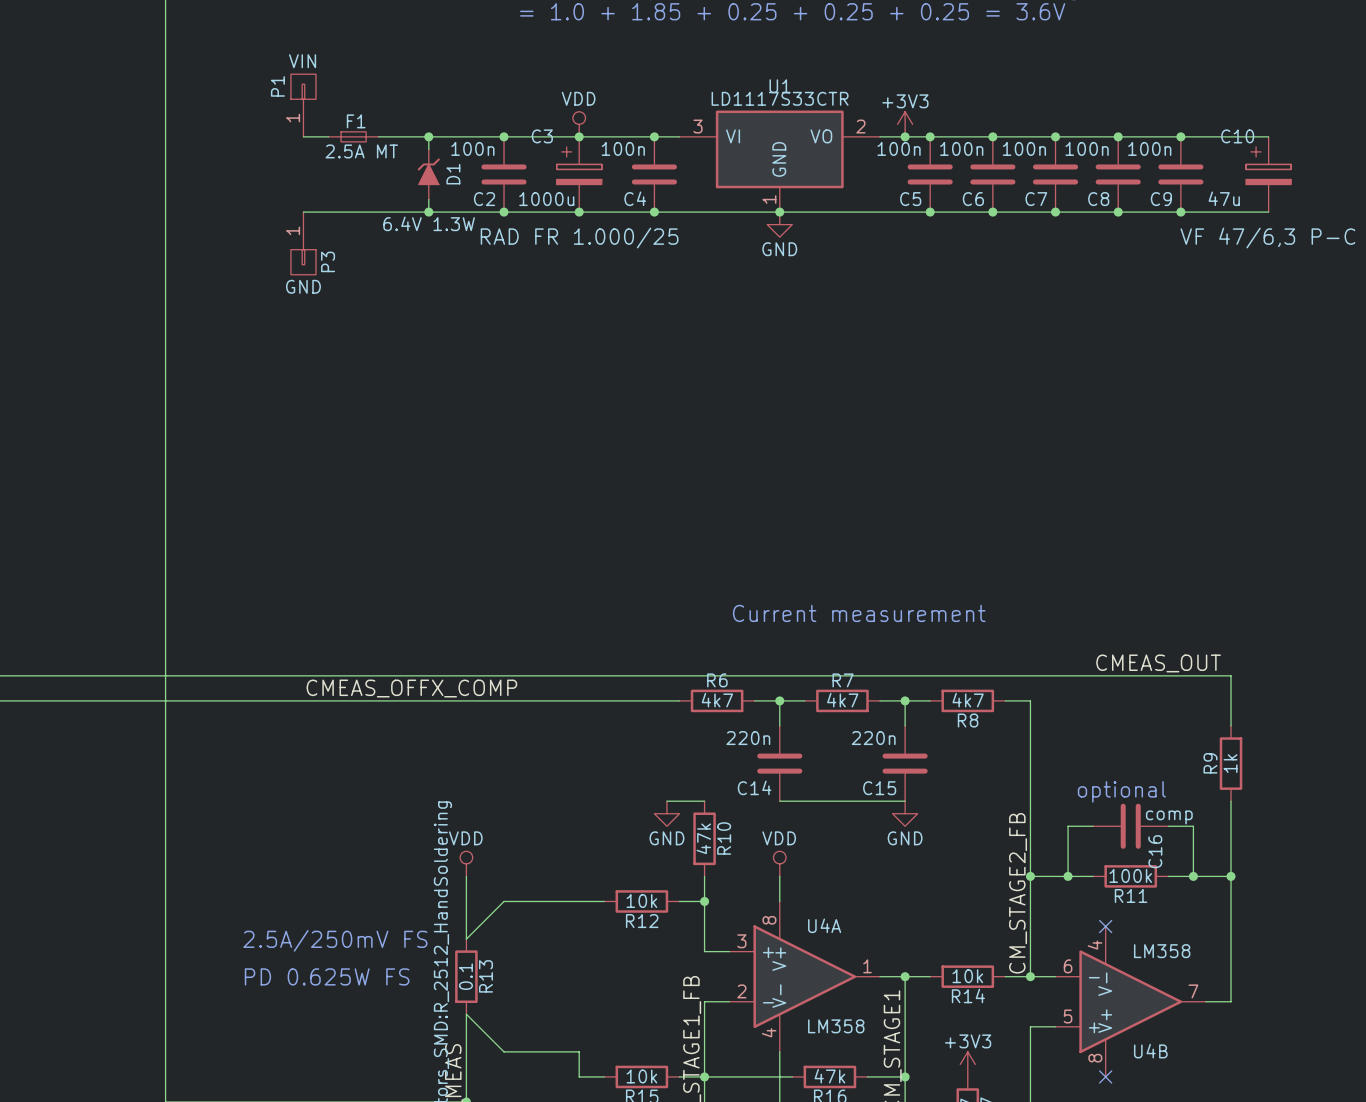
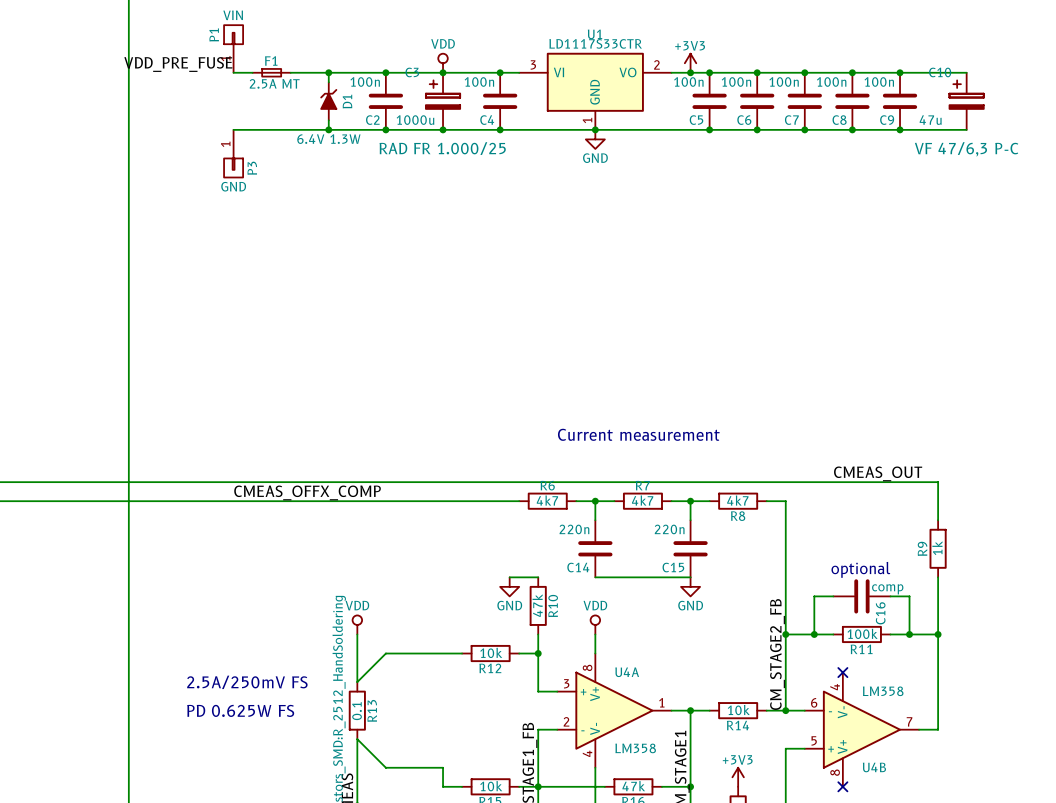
label: none -> VDD_PRE_FUSE (178, 64)

